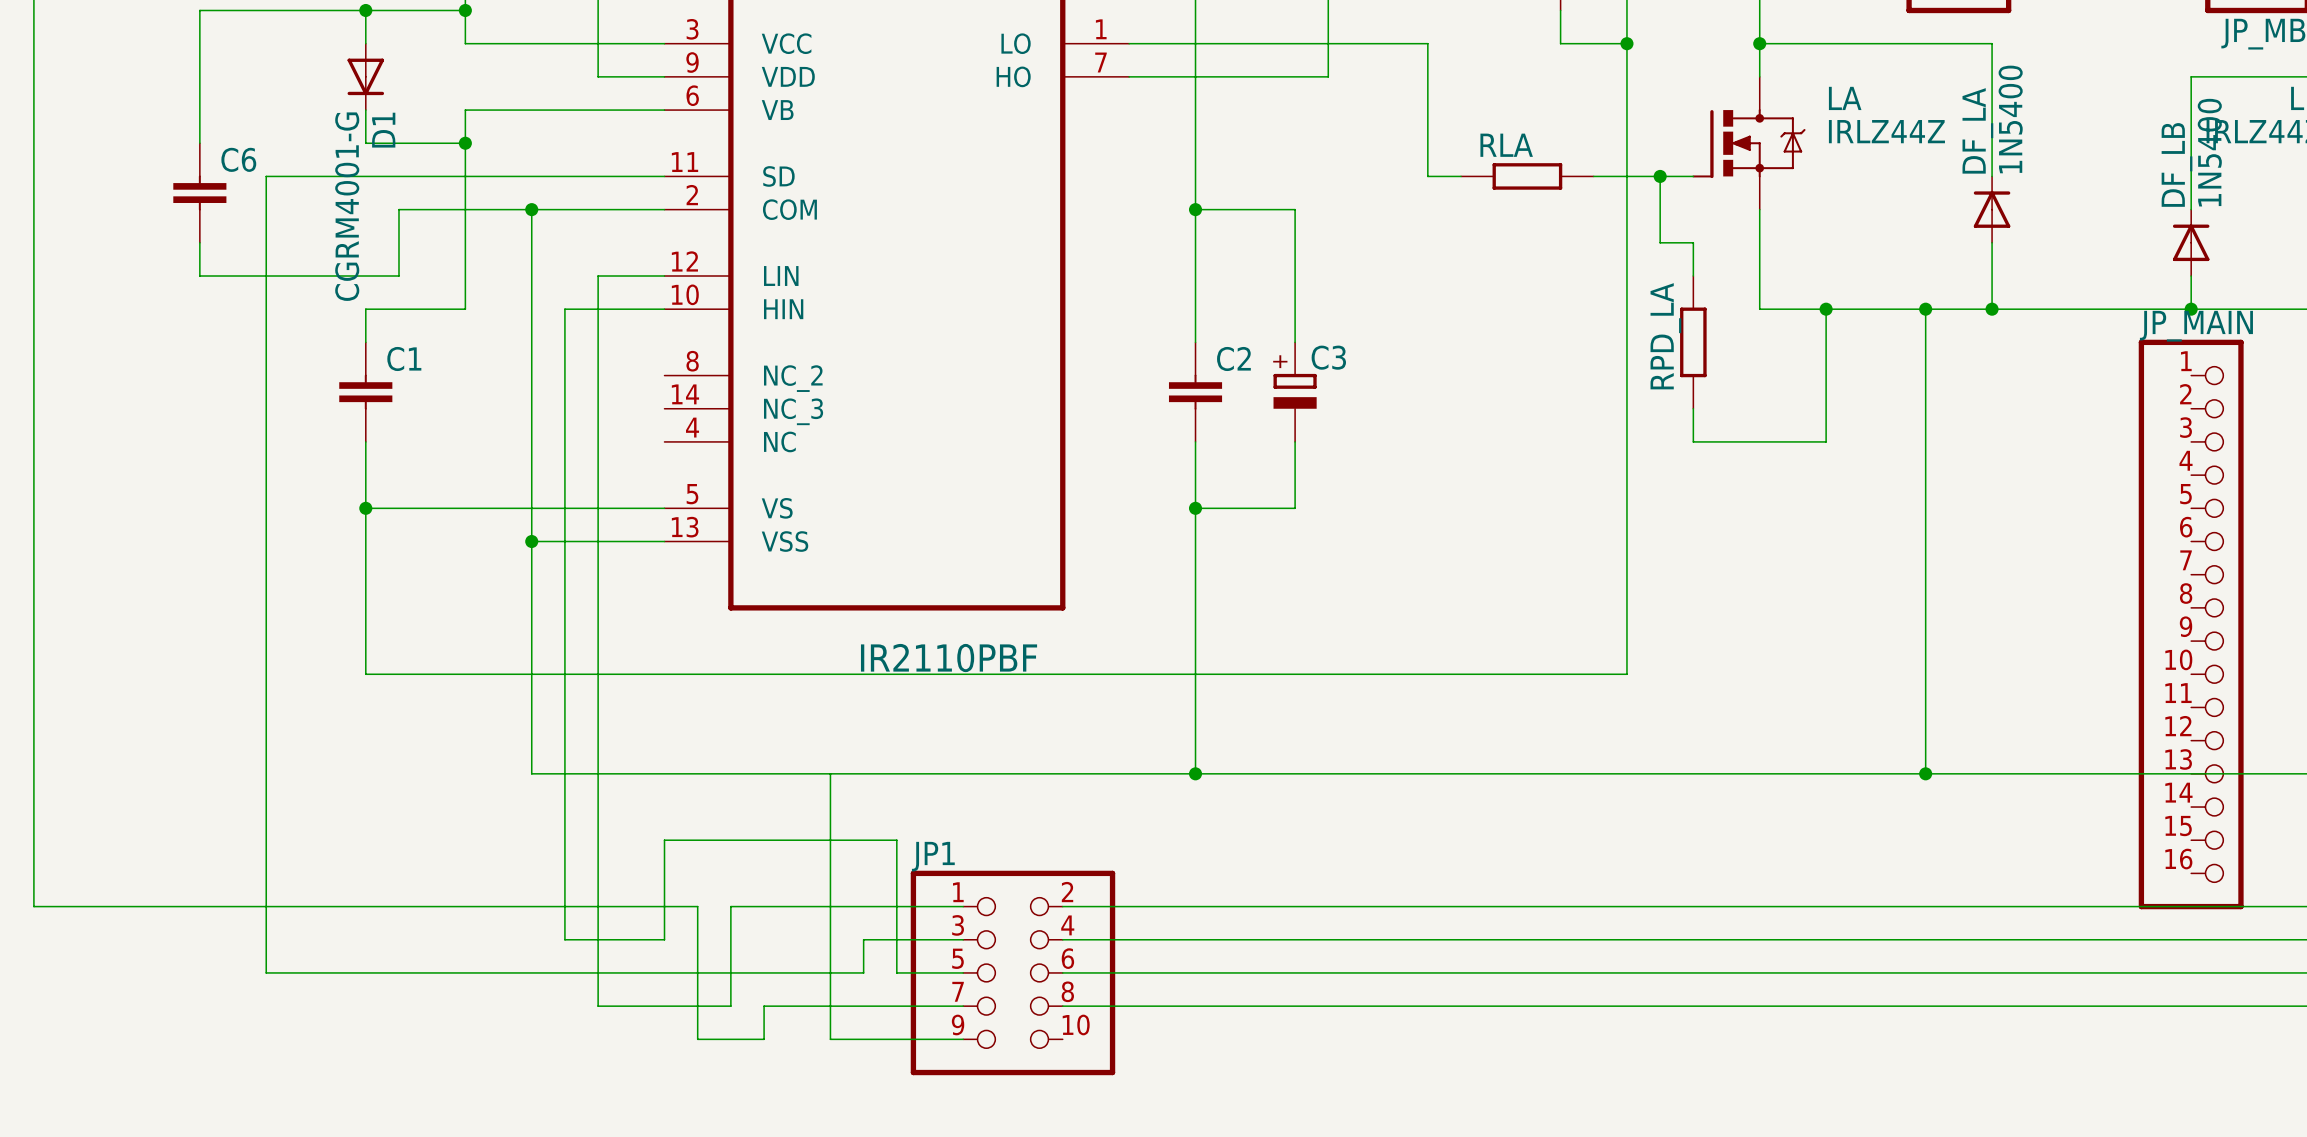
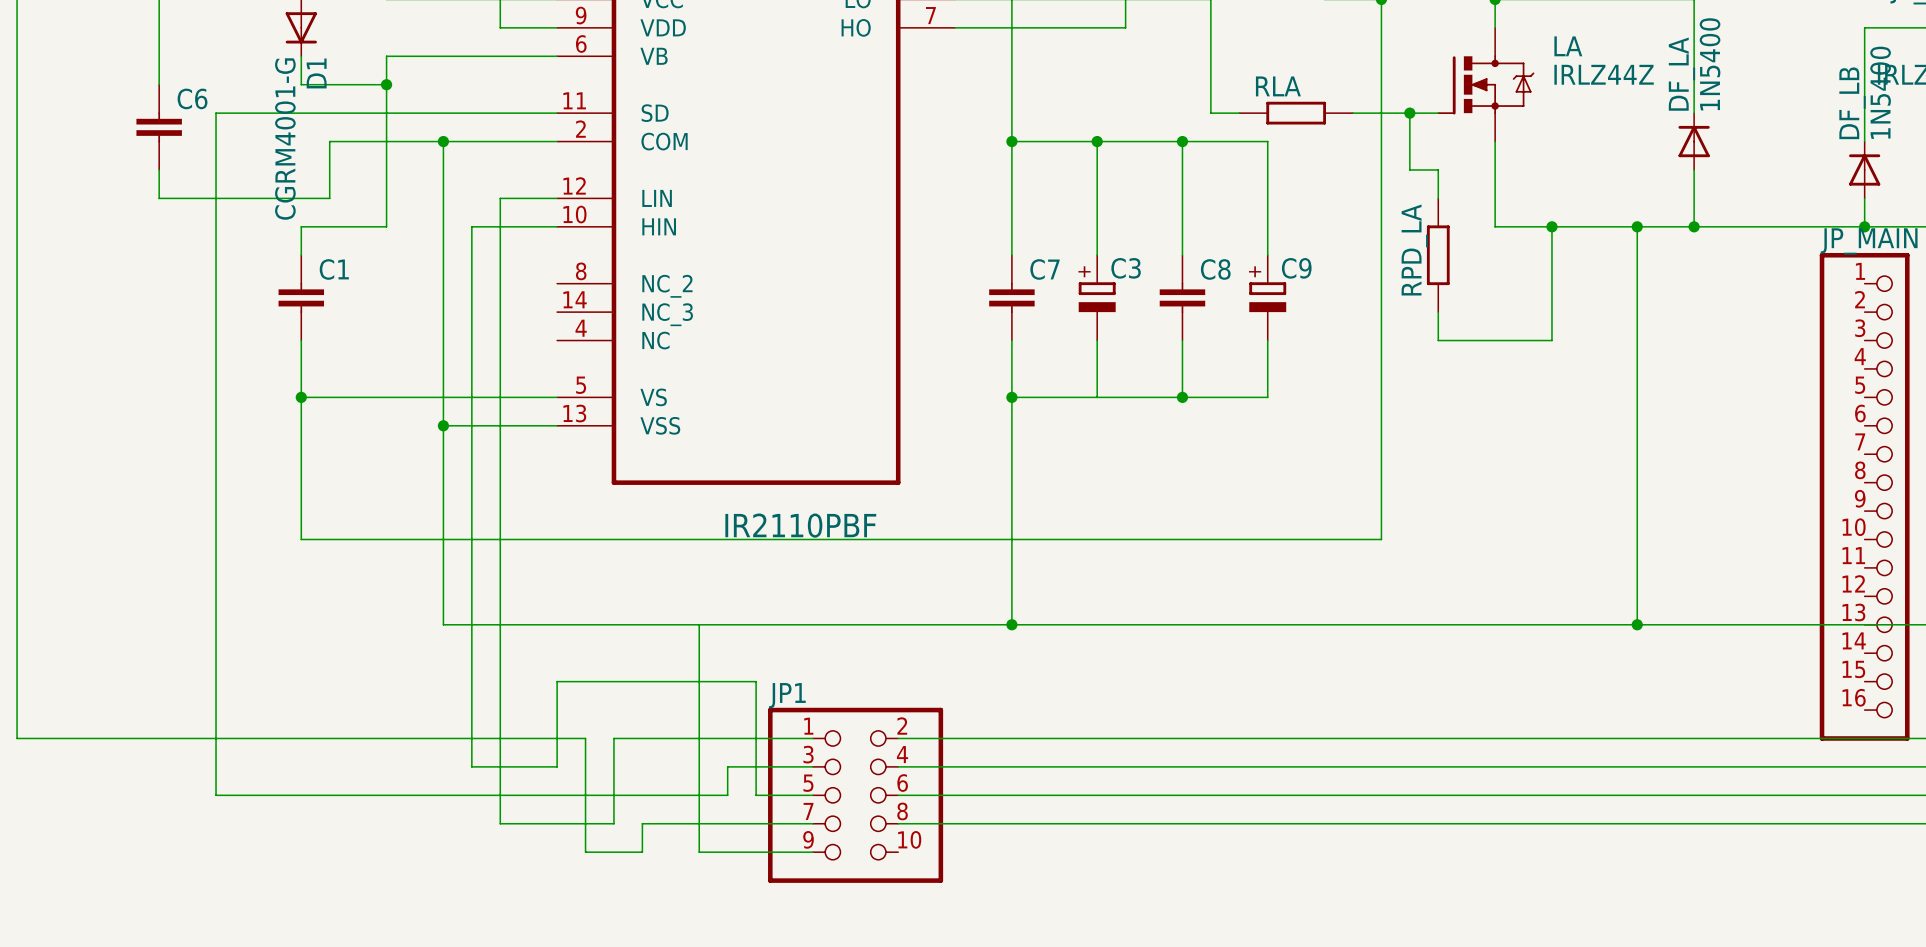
wire: none -> (1097, 141) (1267, 141) (1267, 255)
junction: none -> (1097, 141)
wire: none -> (1182, 141) (1182, 255)
junction: none -> (1182, 141)
C2 name: C2 (1233, 358) -> C7 (1044, 269)
C8: none -> (1182, 297)
C9: none -> (1267, 297)
wire: none -> (1182, 340) (1182, 397)
wire: none -> (1267, 340) (1267, 397) (1097, 397)
junction: none -> (1182, 397)

